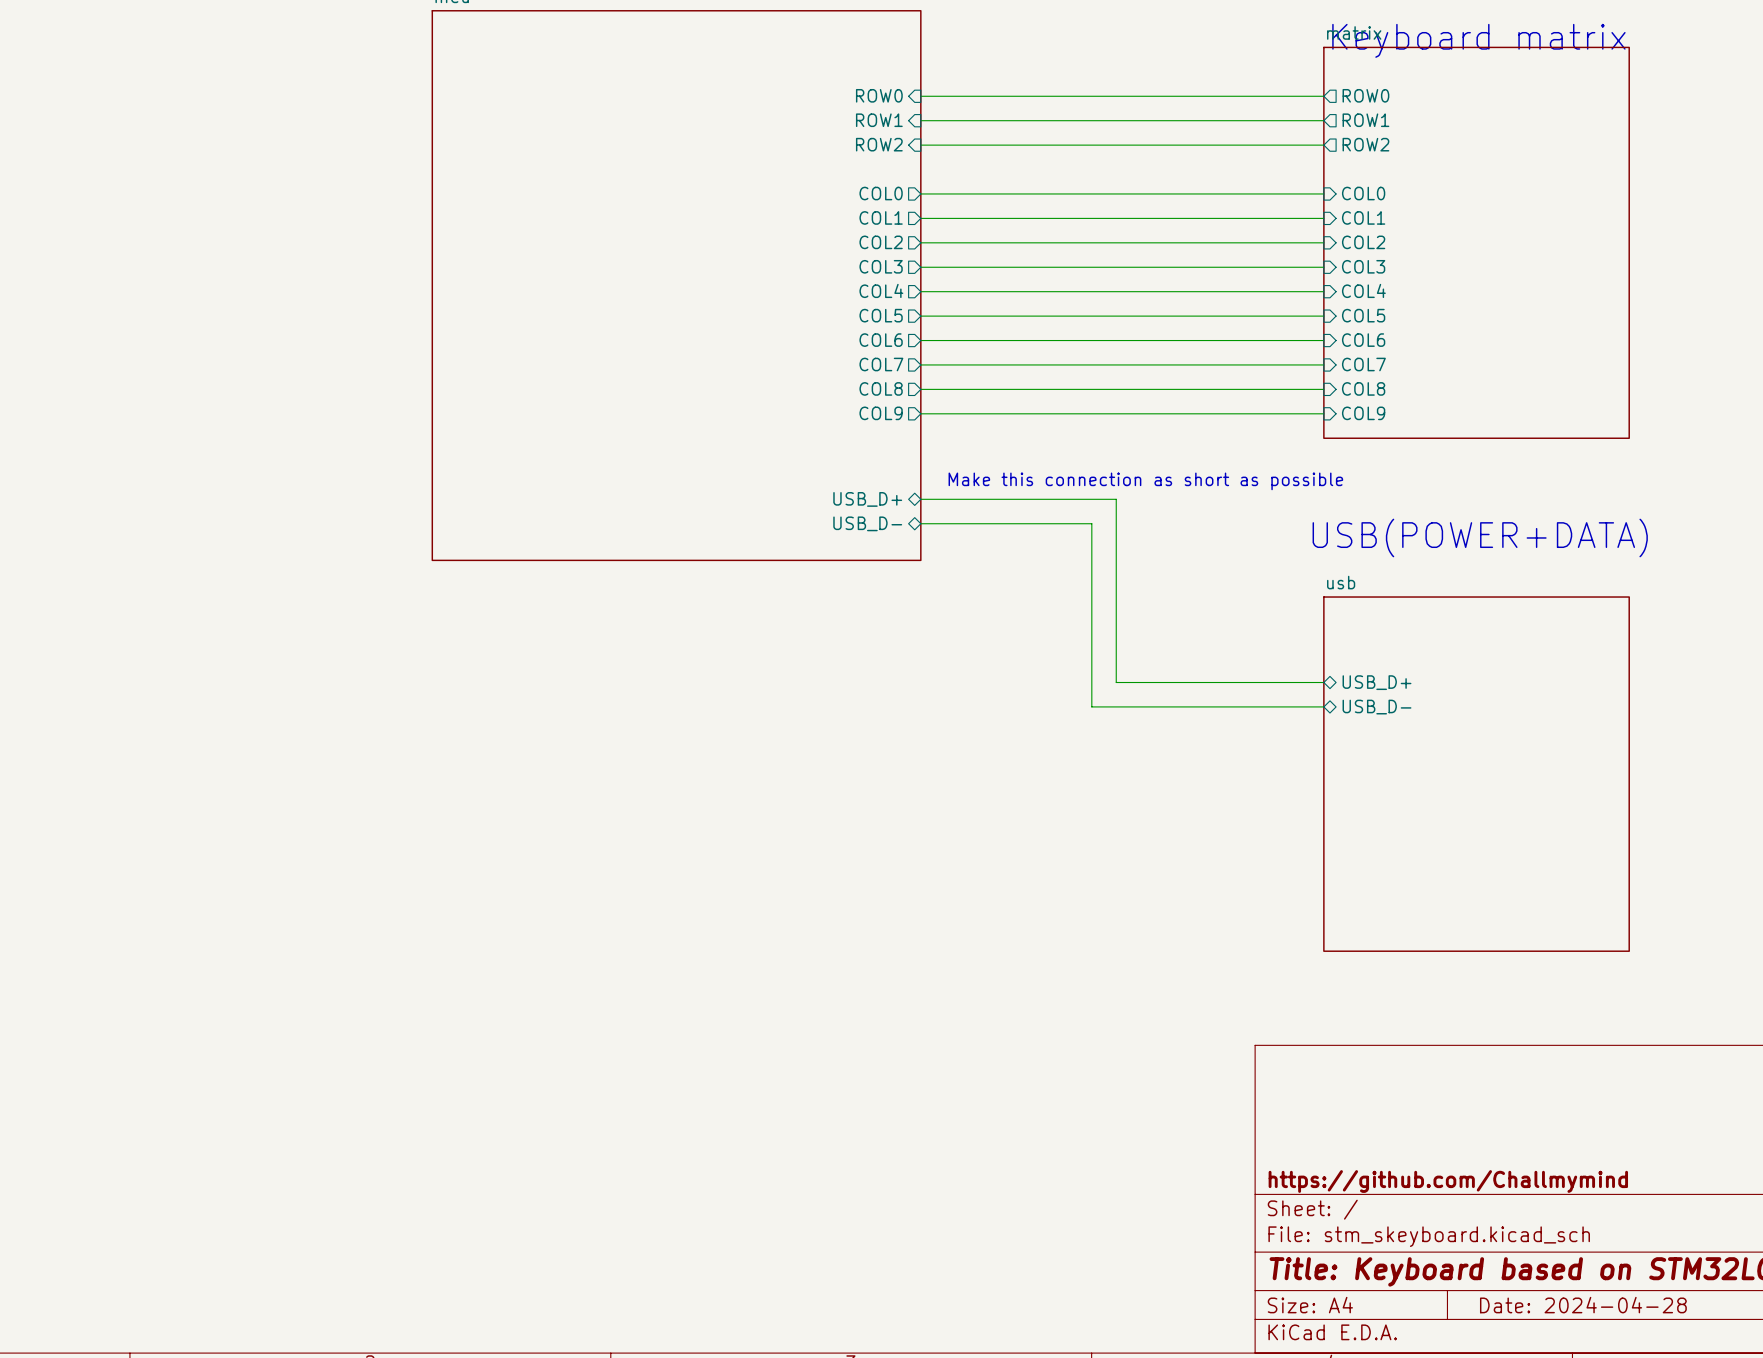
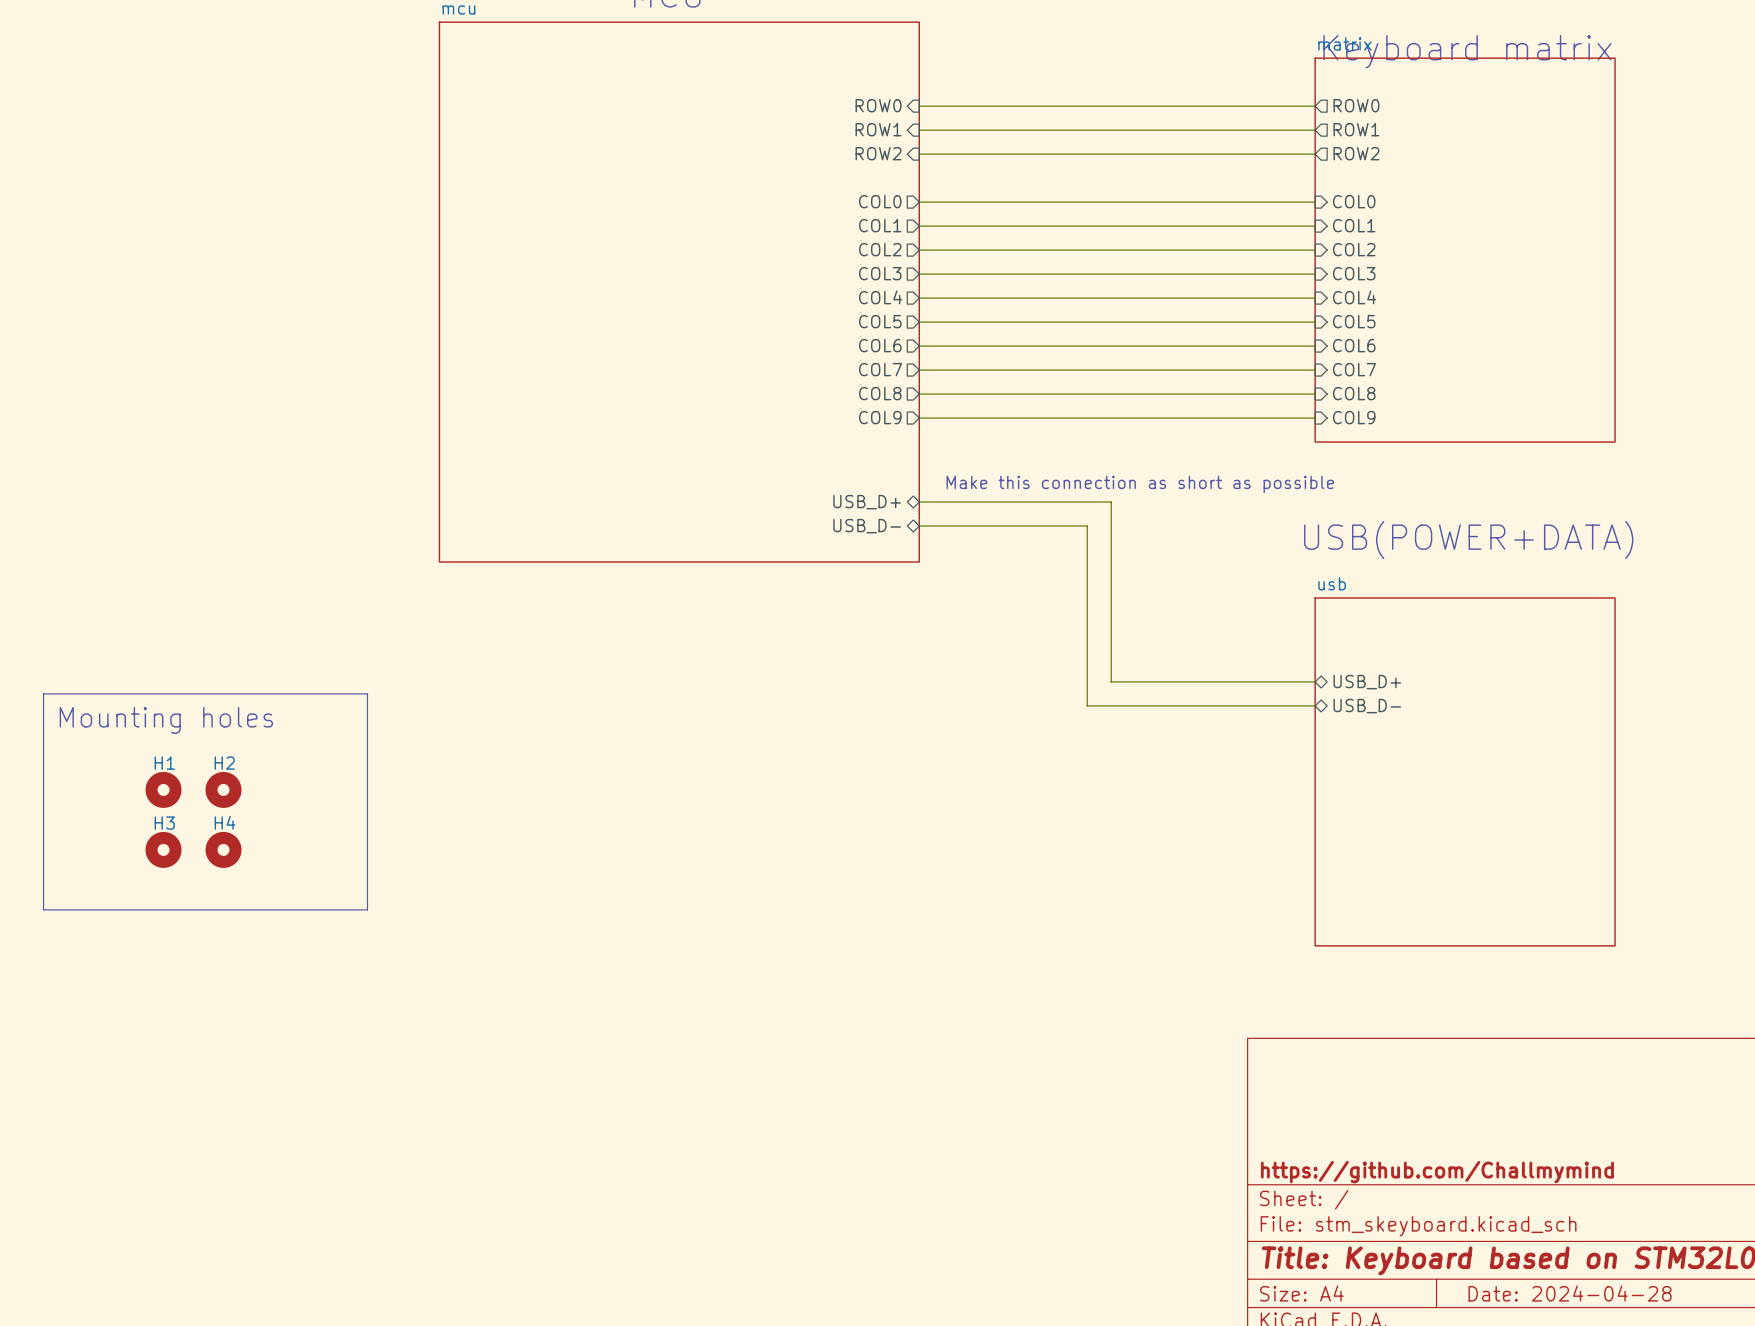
line: none -> (43, 693) (367, 693) (367, 909) (43, 909) (43, 693)
text: none -> Mounting holes (166, 720)
H1: none -> (163, 789)
H2: none -> (223, 789)
H3: none -> (163, 849)
H4: none -> (223, 849)

